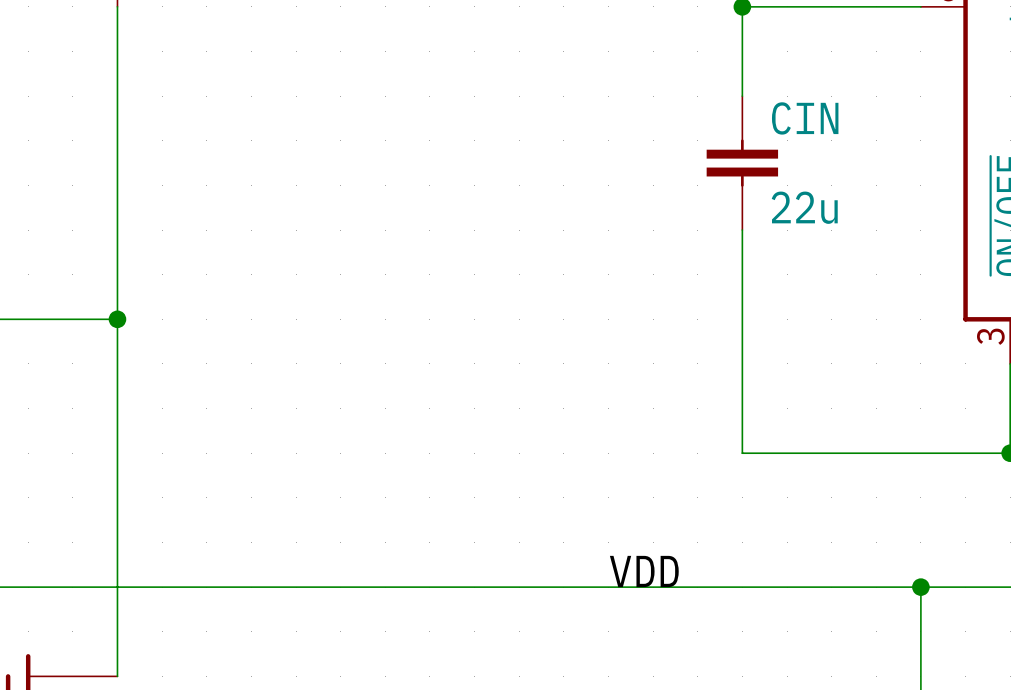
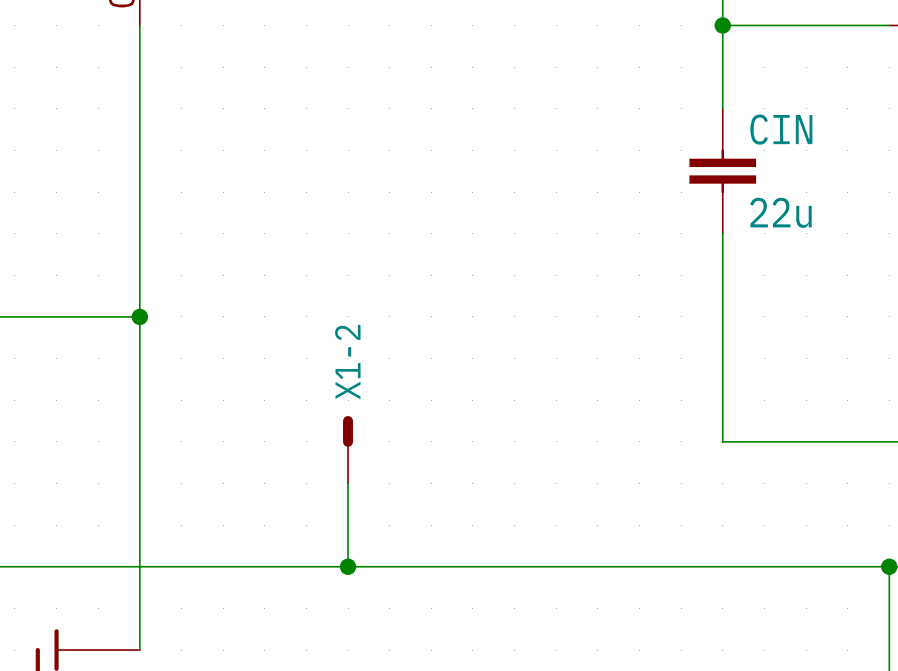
X1-2: none -> (348, 449)
wire: none -> (348, 483) (348, 566)
label: VDD (644, 571) -> none
junction: none -> (348, 566)

